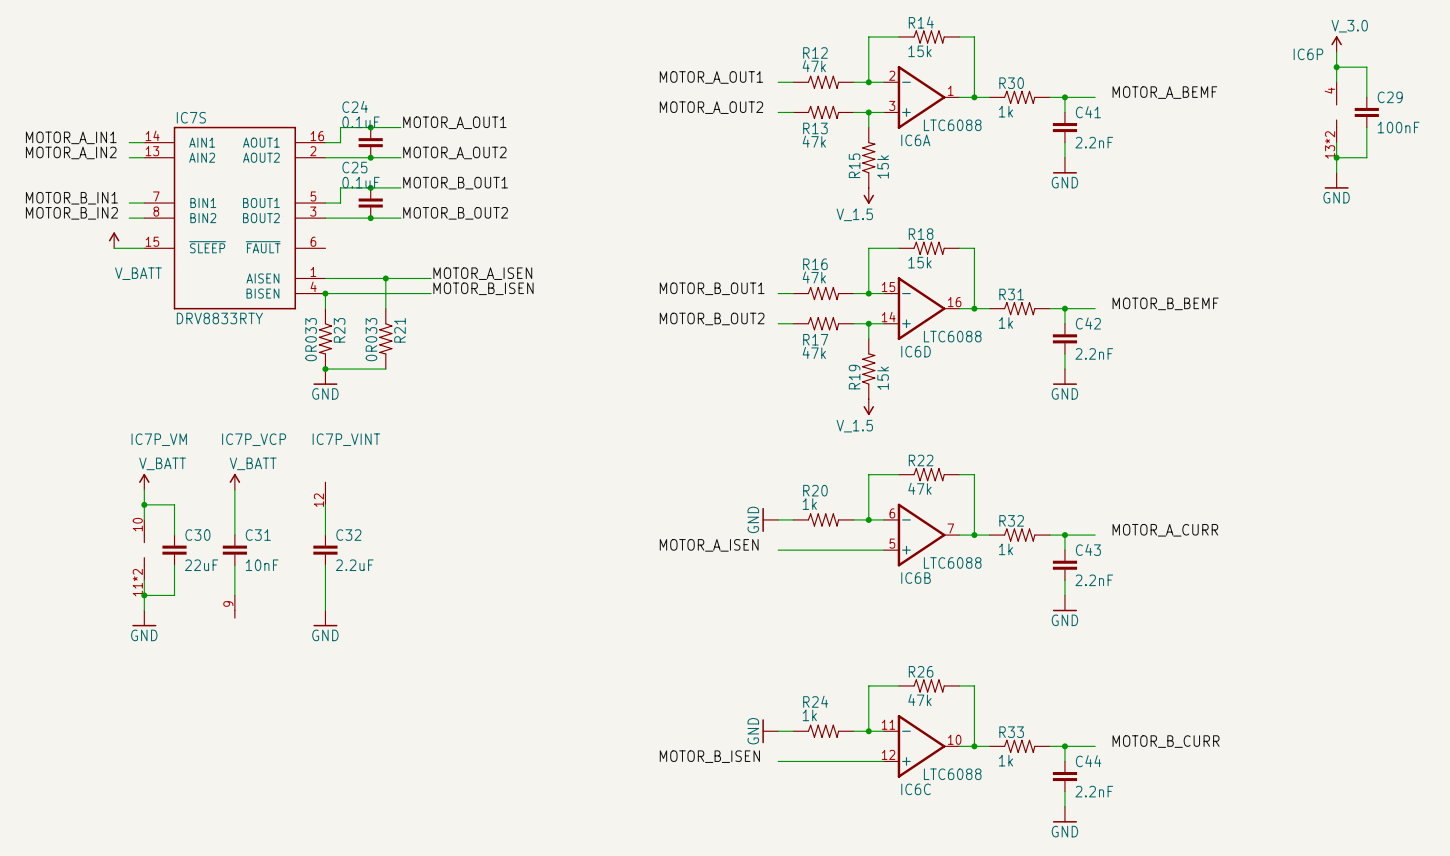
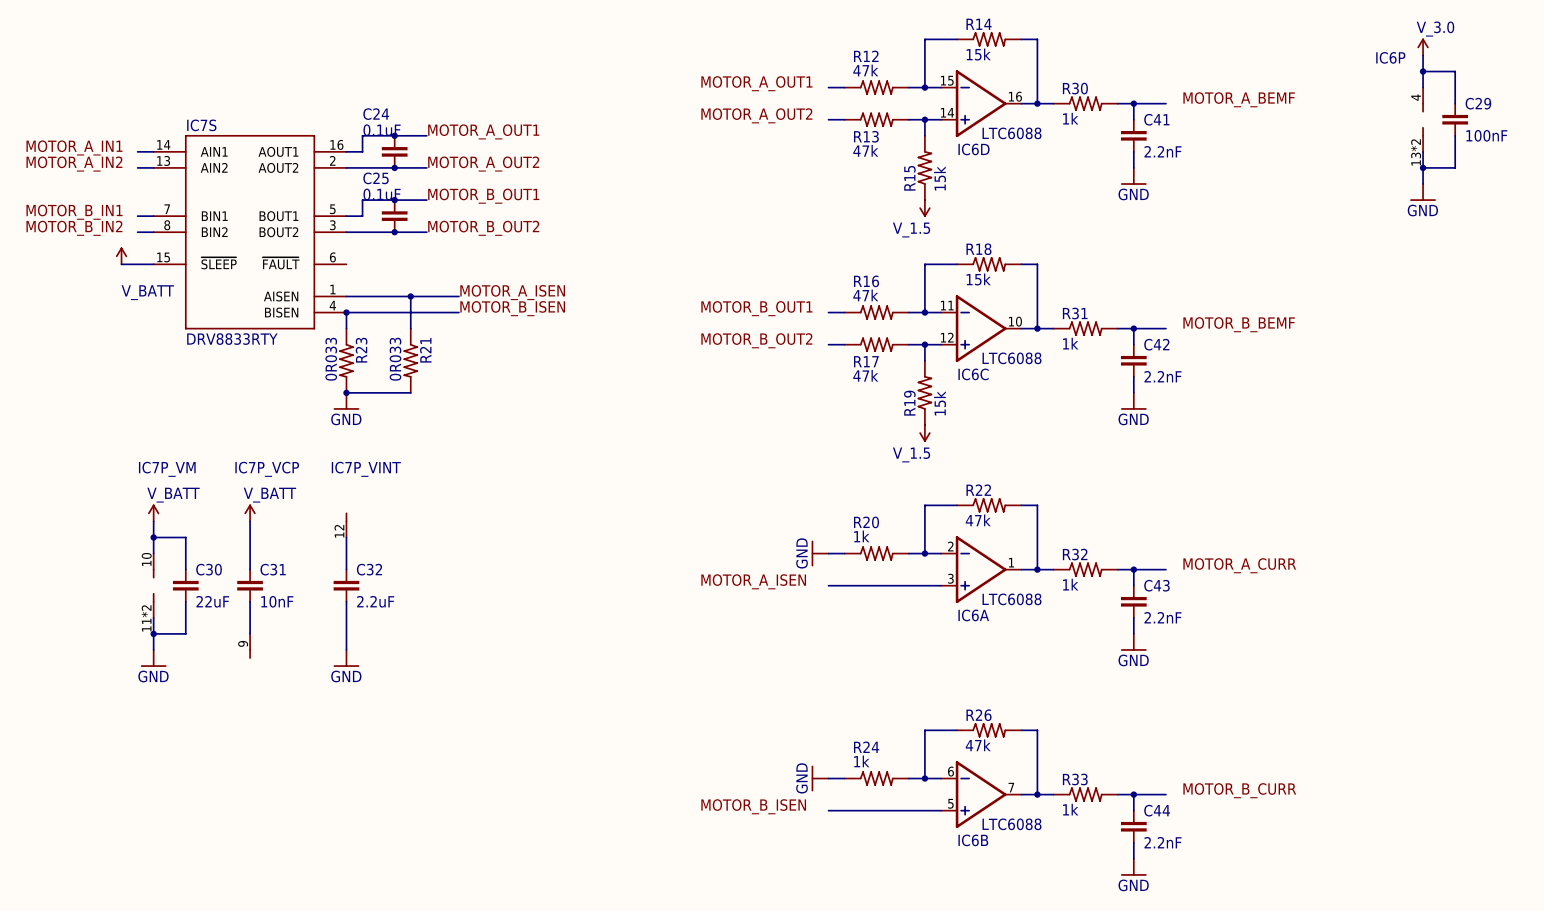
IC6A position: (921, 97) -> (981, 569)
IC6D position: (921, 308) -> (981, 103)
IC6B position: (921, 535) -> (981, 794)
IC6C position: (921, 746) -> (981, 328)

